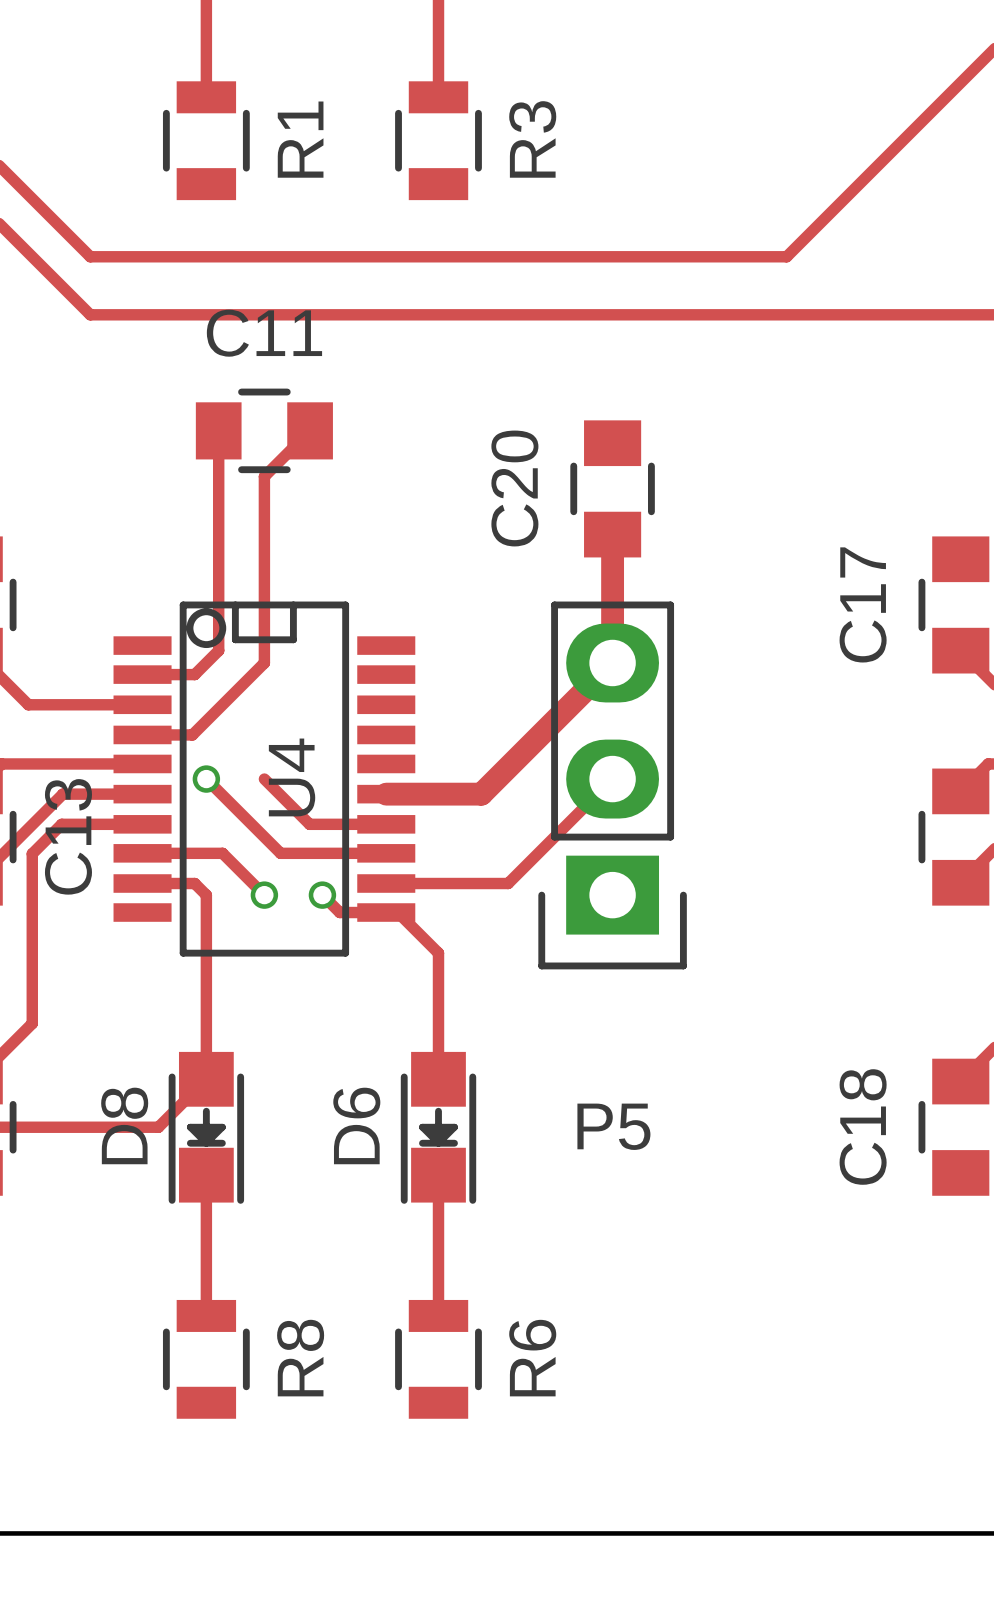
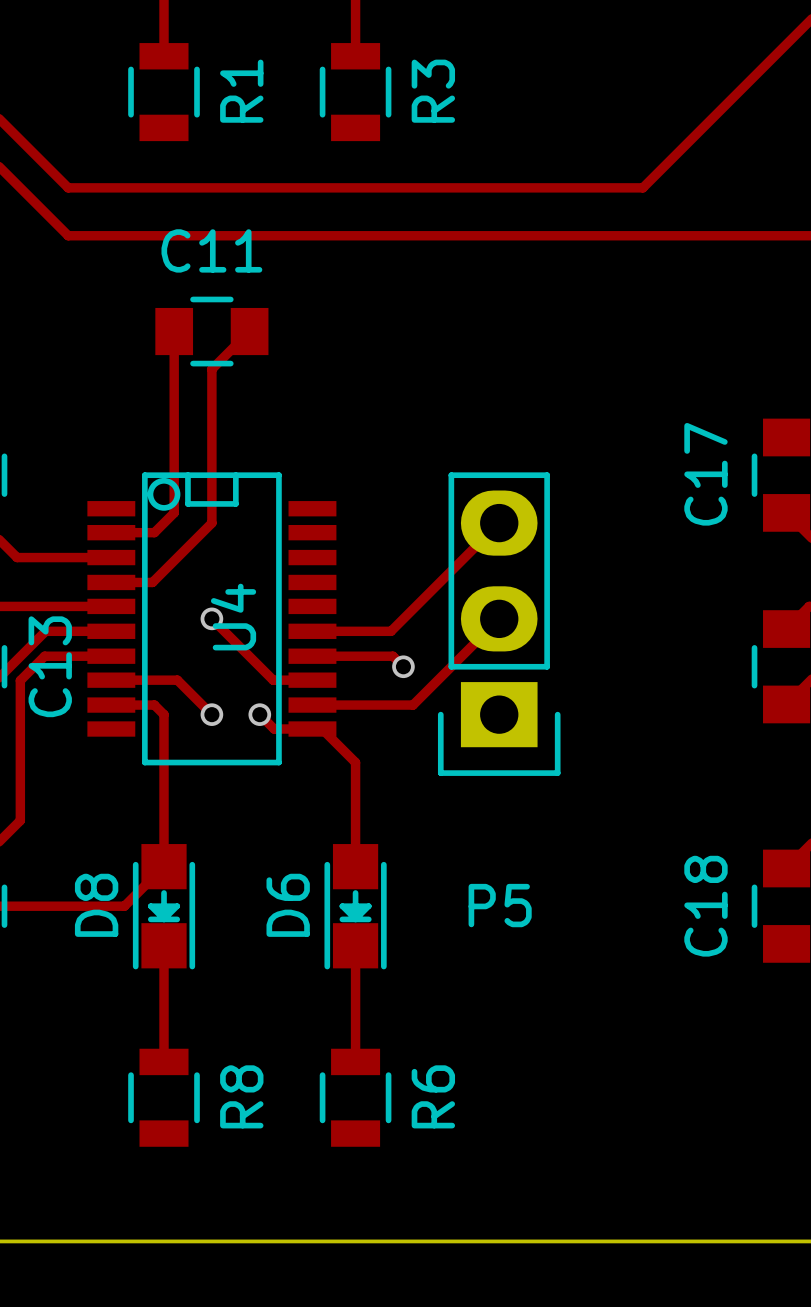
C20: (612, 488) -> none
track: (612, 534) (612, 662) -> none
track width: thick (612, 662) (481, 794) (386, 794) -> thin (499, 523) (391, 631) (312, 631)
track: (206, 779) (280, 853) (338, 853) -> none
via position: (206, 779) -> (211, 618)
track: (309, 824) (386, 824) -> (249, 656) (273, 680)
track: none -> (312, 656) (392, 656) (403, 666)
via: none -> (403, 666)

